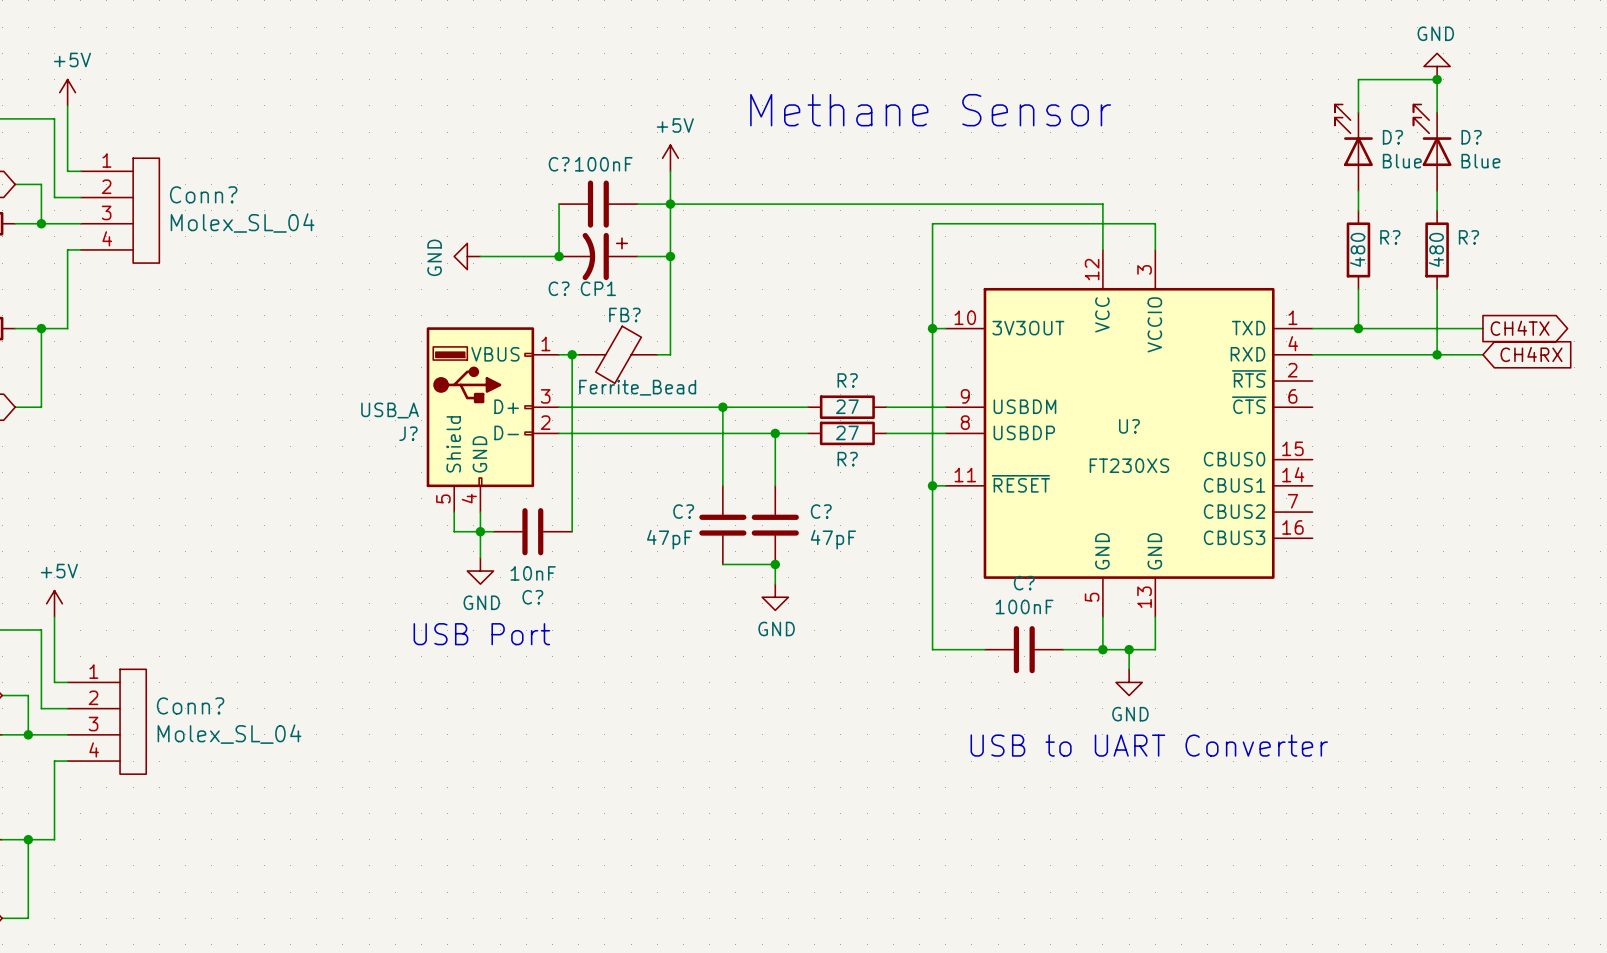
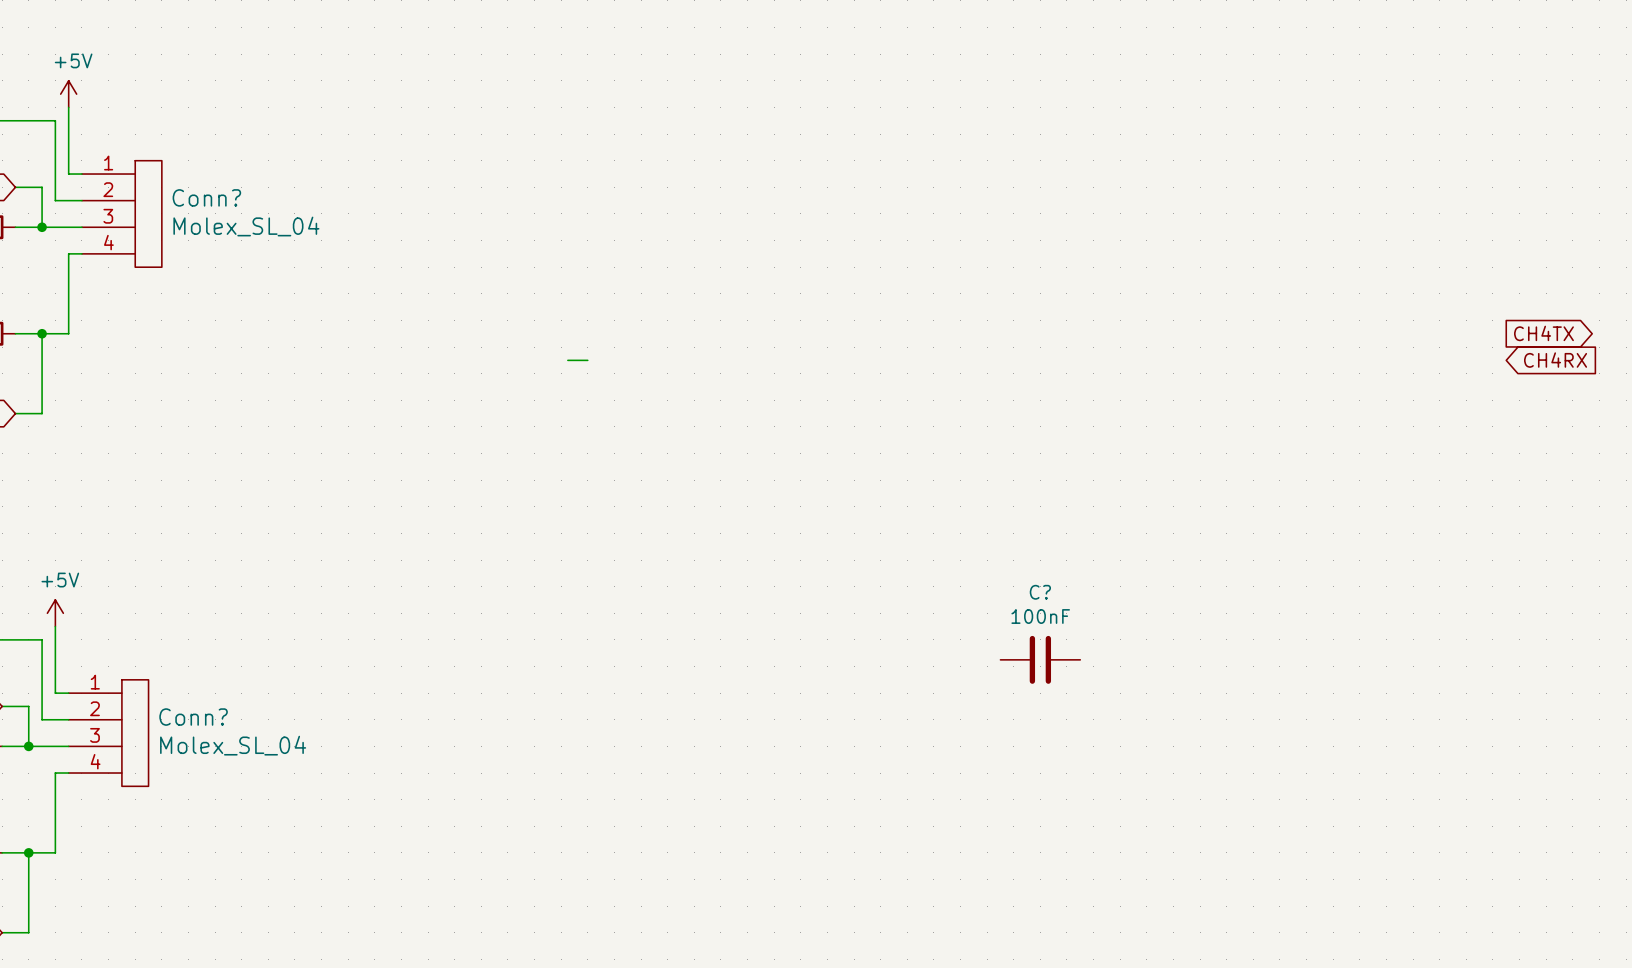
power symbol: GND (1437, 66) -> none
junction: (1437, 79) -> none
text: Methane Sensor (930, 110) -> none
wire: (1358, 112) (1358, 79) (1437, 79) (1437, 112) -> none
D?: Blue (1353, 147) -> none
D?: Blue (1432, 147) -> none
power symbol: +5V (670, 158) -> none
wire: (670, 171) (670, 354) (657, 354) -> none
wire: (1358, 190) (1358, 210) -> none
wire: (1437, 190) (1437, 210) -> none
wire: (559, 204) (559, 256) (480, 256) -> none
C?: 100nF (598, 204) -> none
wire: (637, 204) (1102, 204) (1102, 249) -> none
junction: (670, 204) -> none
wire: (1155, 249) (1155, 223) (932, 223) (932, 649) (984, 649) -> none
R?: 480 (1358, 249) -> none
R?: 480 (1437, 249) -> none
power symbol: GND (467, 256) -> none
junction: (559, 256) -> none
C?: CP1 (598, 256) -> none
wire: (637, 256) (670, 256) -> none
junction: (670, 256) -> none
wire: (1358, 289) (1358, 328) -> none
wire: (1437, 289) (1437, 354) -> none
wire: (932, 328) (945, 328) -> none
junction: (932, 328) -> none
wire: (1312, 328) (1482, 328) -> none
junction: (1358, 328) -> none
wire: (572, 354) (572, 531) -> none
junction: (572, 354) -> none
FB?: Ferrite_Bead (618, 354) -> none
wire: (1312, 354) (1482, 354) -> none
junction: (1437, 354) -> none
wire: (559, 407) (808, 407) -> none
wire: (722, 407) (722, 485) -> none
junction: (722, 407) -> none
R?: 27 (847, 407) -> none
wire: (886, 407) (945, 407) -> none
J?: USB_A (492, 419) -> none
wire: (559, 433) (808, 433) -> none
wire: (775, 433) (775, 485) -> none
junction: (775, 433) -> none
R?: 27 (847, 433) -> none
wire: (886, 433) (945, 433) -> none
U?: FT230XS (1129, 433) -> none
wire: (932, 485) (945, 485) -> none
junction: (932, 485) -> none
wire: (454, 512) (454, 531) (493, 531) -> none
wire: (480, 512) (480, 557) -> none
C?: 47pF (722, 525) -> none
C?: 47pF (775, 525) -> none
junction: (480, 531) -> none
C?: 10nF (532, 531) -> none
wire: (722, 564) (775, 564) (775, 584) -> none
junction: (775, 564) -> none
power symbol: GND (480, 571) -> none
power symbol: GND (775, 597) -> none
wire: (1102, 616) (1102, 649) -> none
wire: (1155, 616) (1155, 649) (1063, 649) -> none
text: USB Port (481, 634) -> none
junction: (1102, 649) -> none
wire: (1129, 649) (1129, 669) -> none
junction: (1129, 649) -> none
power symbol: GND (1129, 682) -> none
text: USB to UART Converter (1149, 745) -> none

